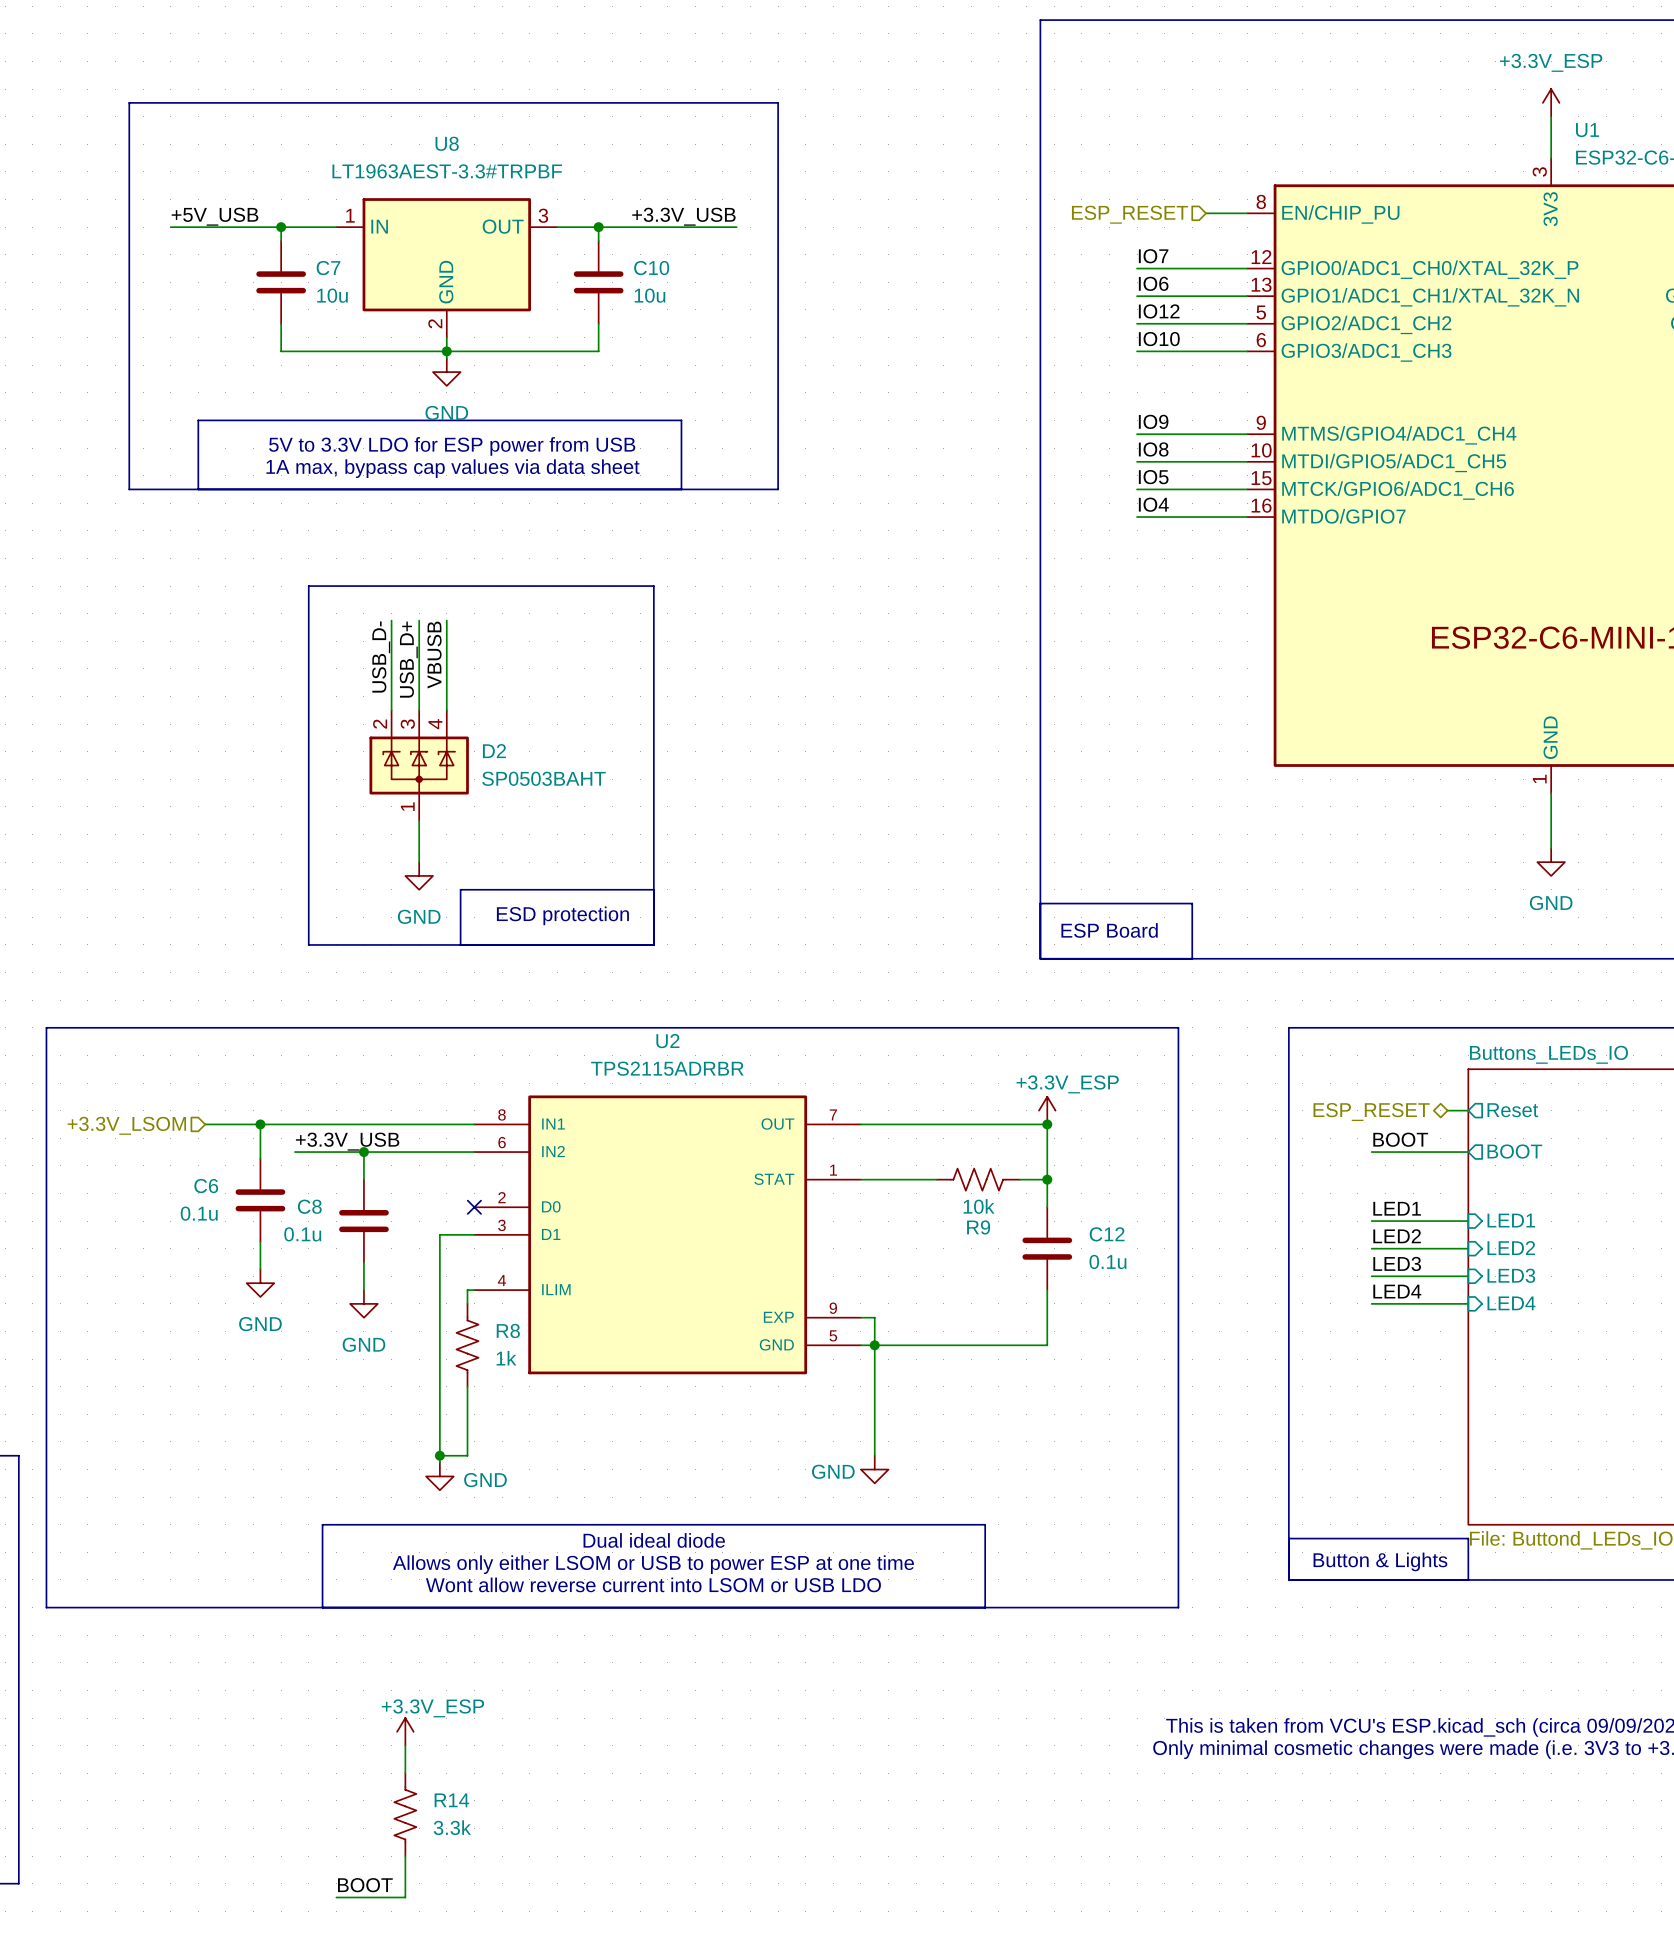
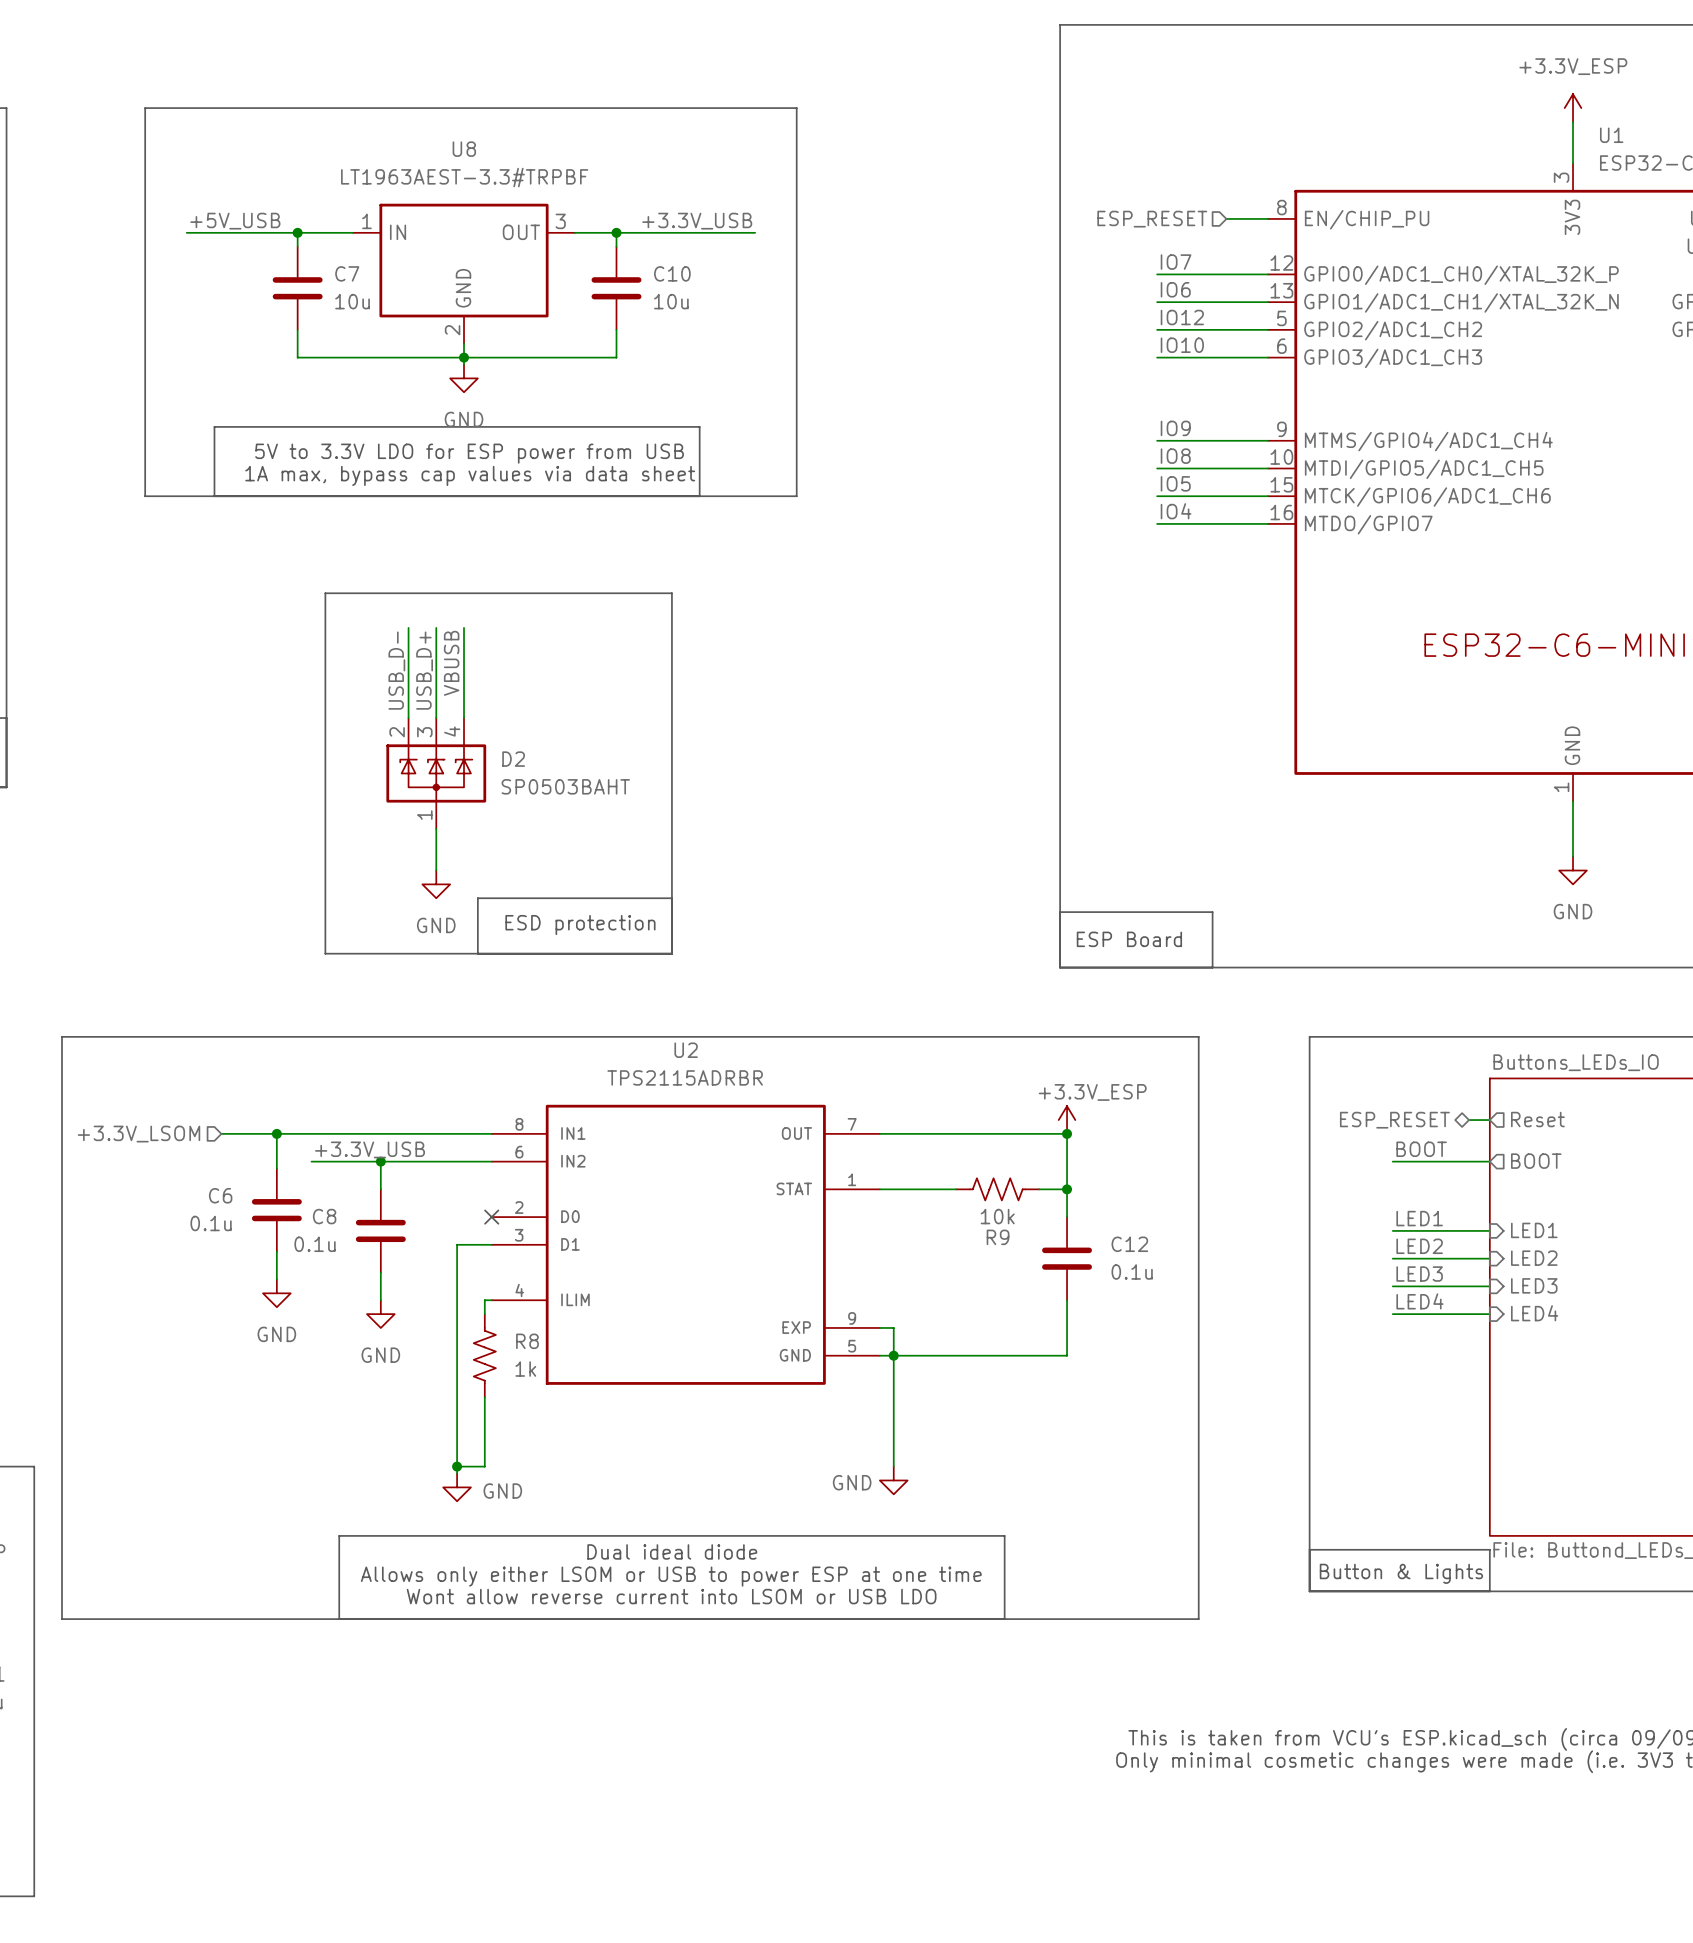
power symbol: +3.3V_ESP (405, 1731) -> none
wire: (405, 1745) (405, 1773) -> none
R14: 3.3k (405, 1814) -> none
wire: (405, 1856) (405, 1897) (336, 1897) -> none
label: BOOT (365, 1885) -> none

